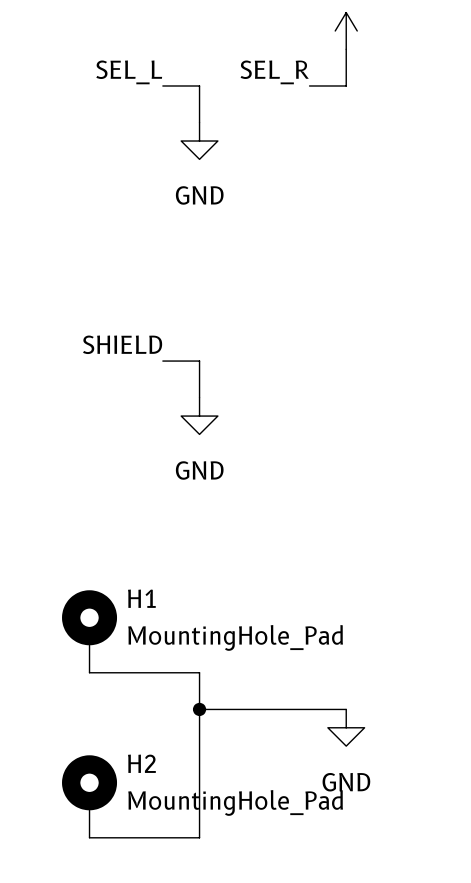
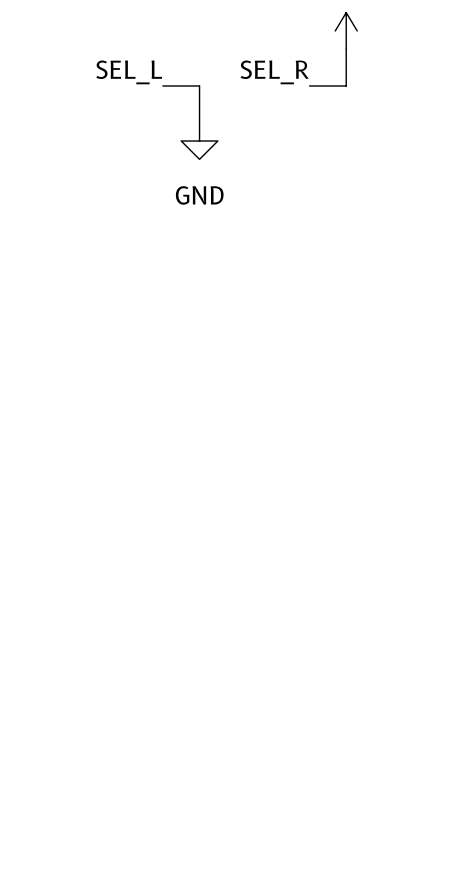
label: SHIELD (122, 344) -> none
wire: (162, 361) (199, 361) (199, 397) -> none
power symbol: GND (199, 416) -> none
H1: MountingHole_Pad (89, 631) -> none
wire: (89, 672) (199, 672) (199, 837) (89, 837) -> none
wire: (199, 709) (346, 709) -> none
junction: (199, 709) -> none
power symbol: GND (346, 727) -> none
H2: MountingHole_Pad (89, 796) -> none

